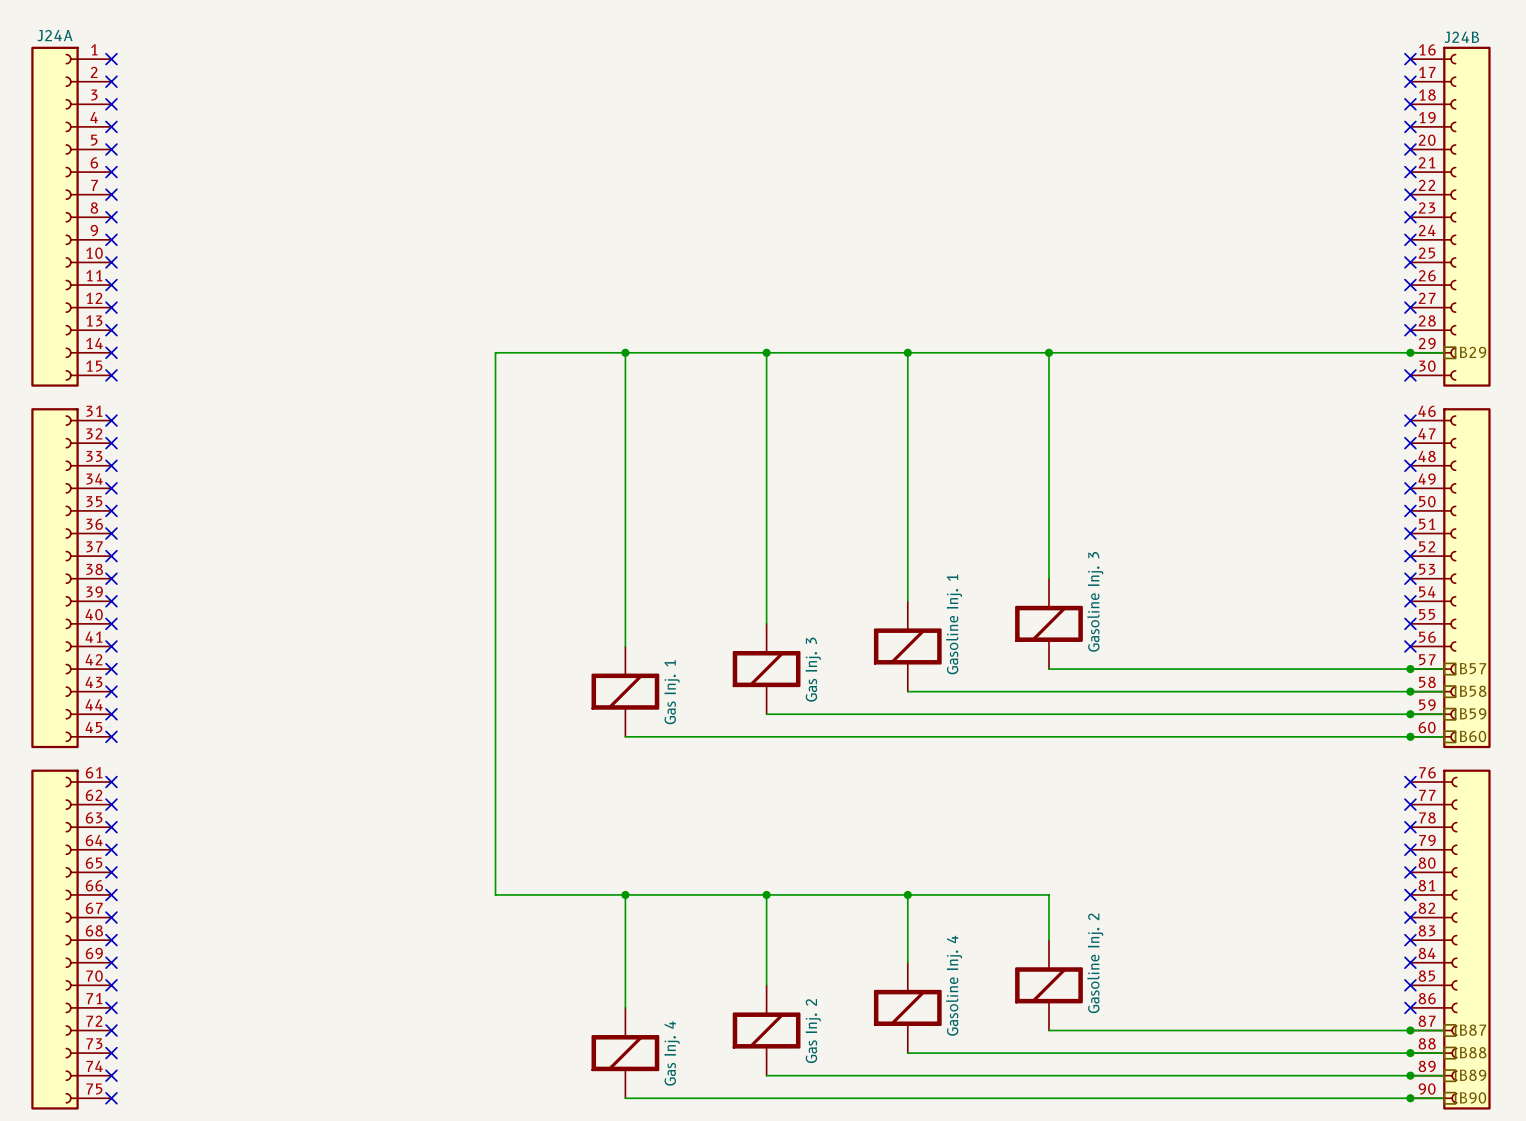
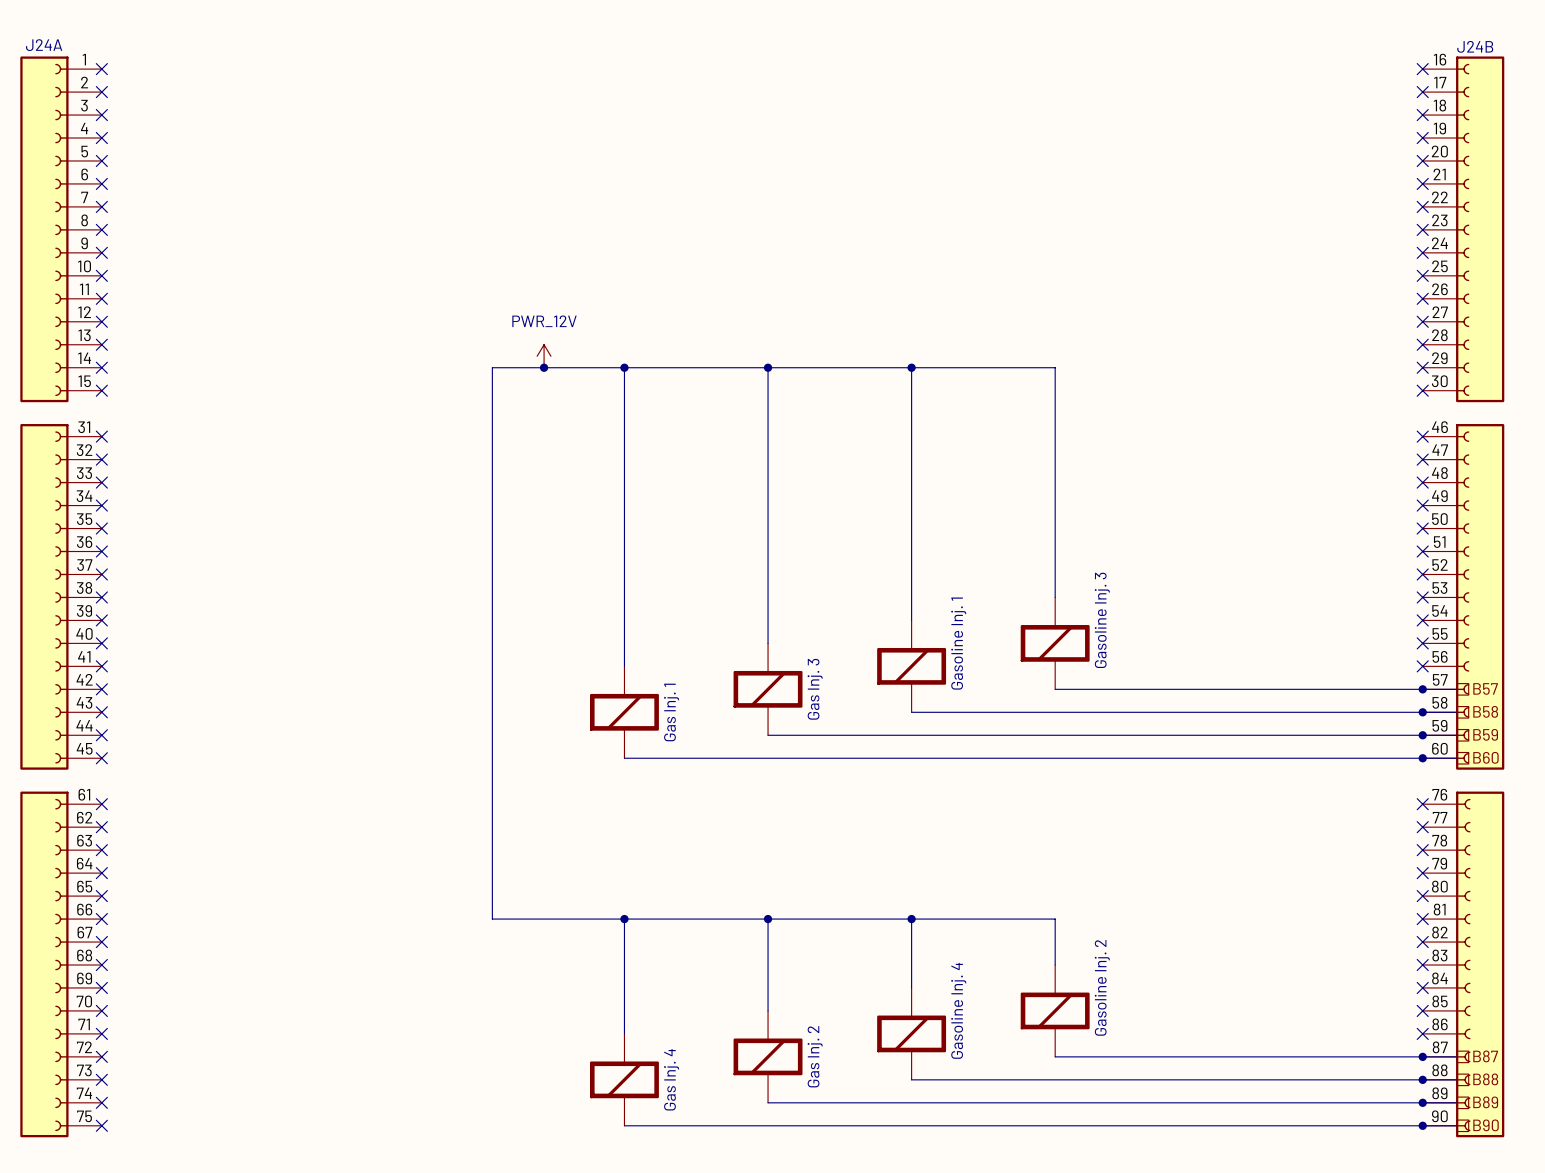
power symbol: none -> PWR_12V (544, 356)
junction: none -> (544, 367)
wire: (1048, 352) (1444, 352) -> none
junction: (1048, 352) -> none
junction: (1410, 352) -> none
no-connect mark: none -> (1422, 367)
hierarchical label: B29 (1473, 352) -> none

